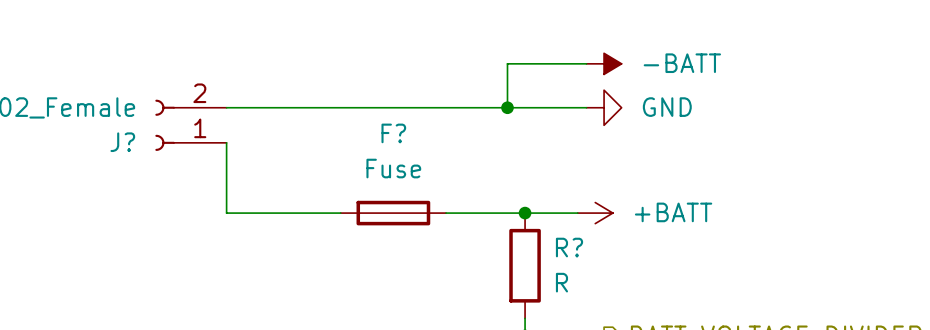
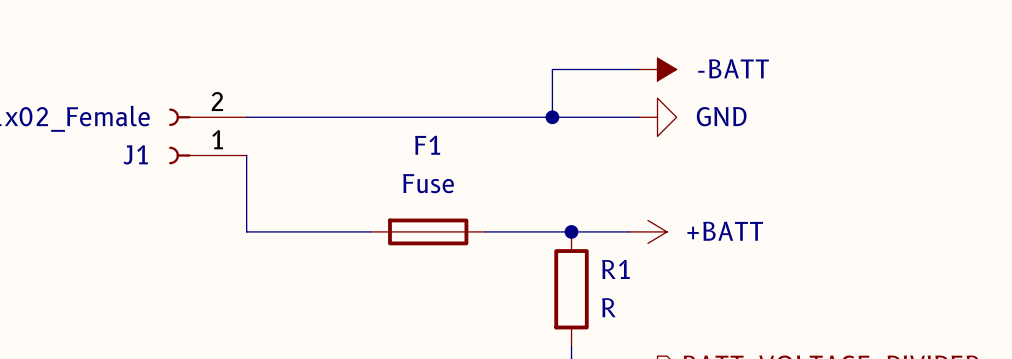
F? name: F? (393, 133) -> F1 (427, 145)
J? name: J? (122, 142) -> J1 (135, 154)
R? name: R? (569, 247) -> R1 (615, 269)

